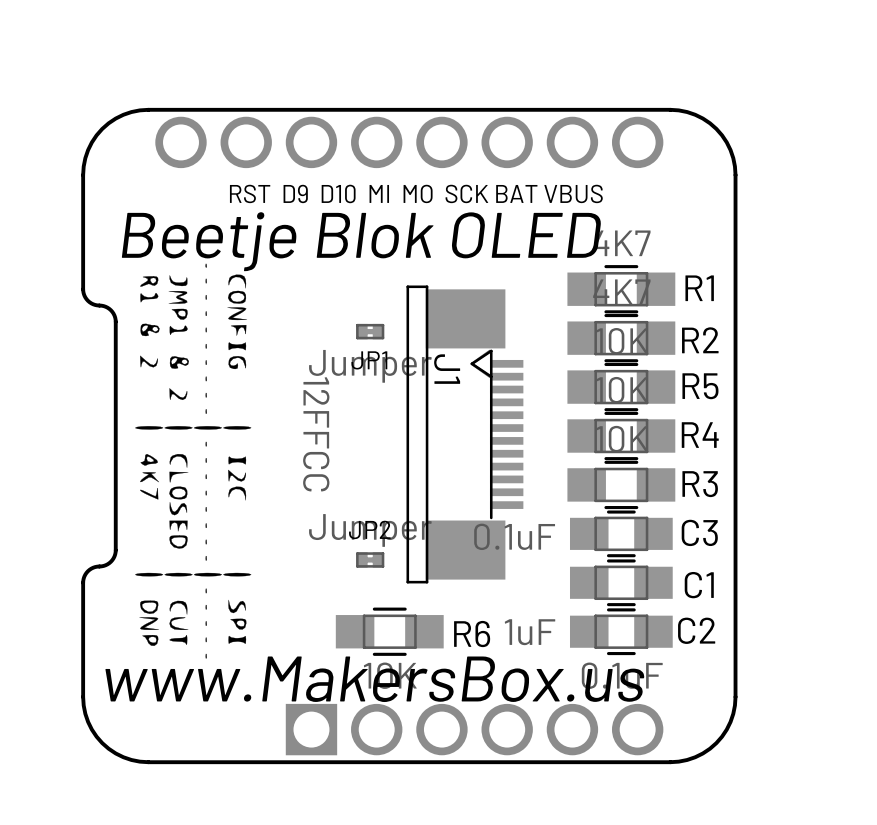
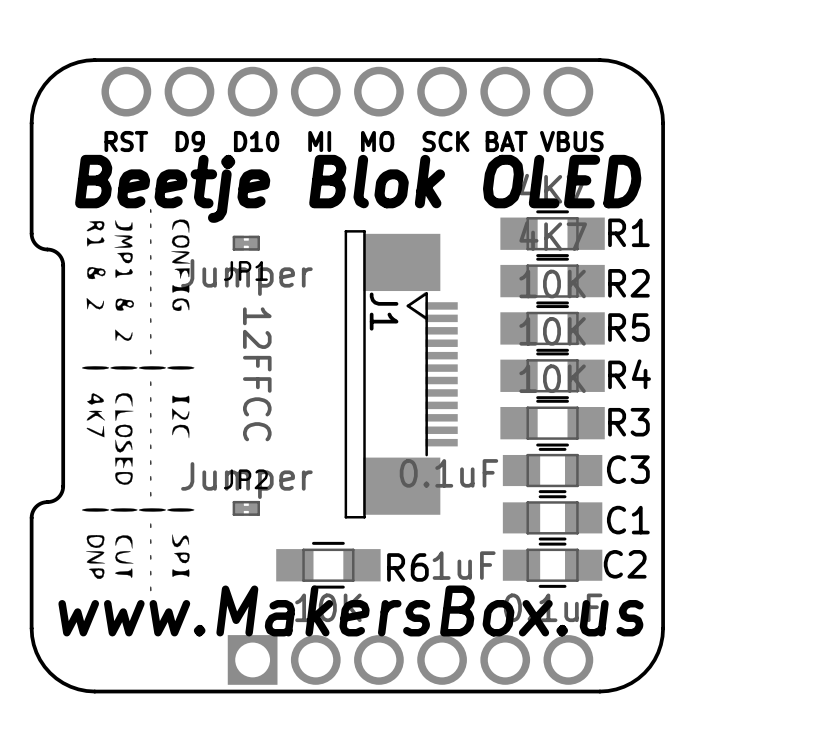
JP1 position: (370, 331) -> (246, 243)
JP2 position: (370, 559) -> (246, 508)

